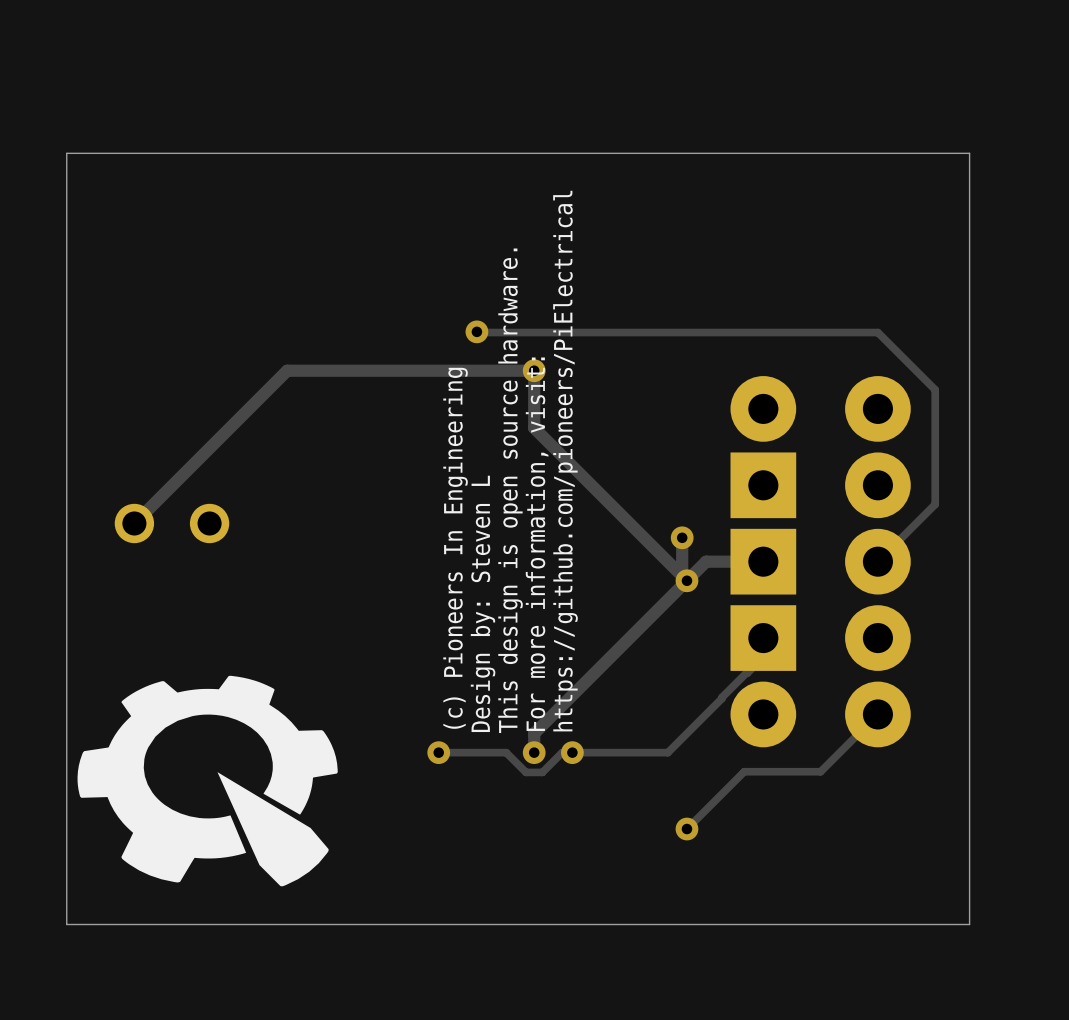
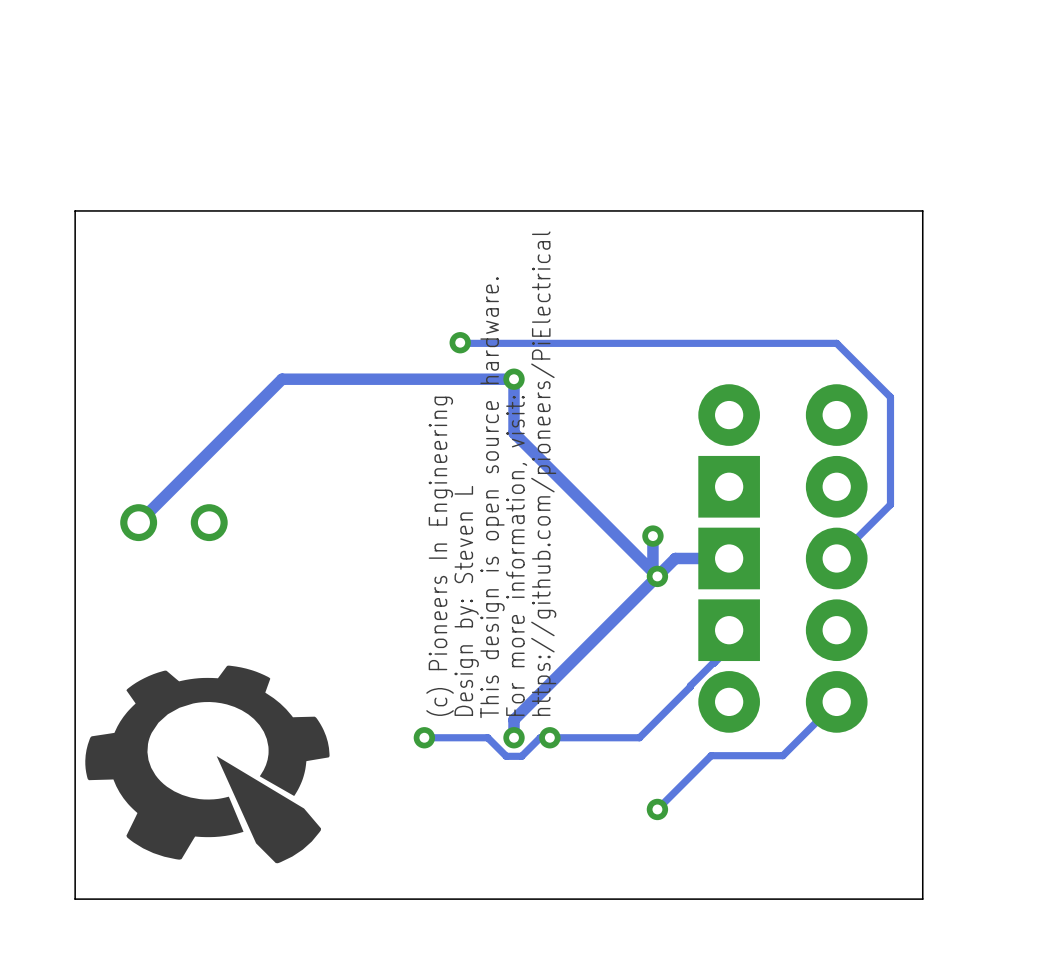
board edge: (969, 191) (969, 153) (66, 153) (66, 191) -> (922, 210) (75, 210)

